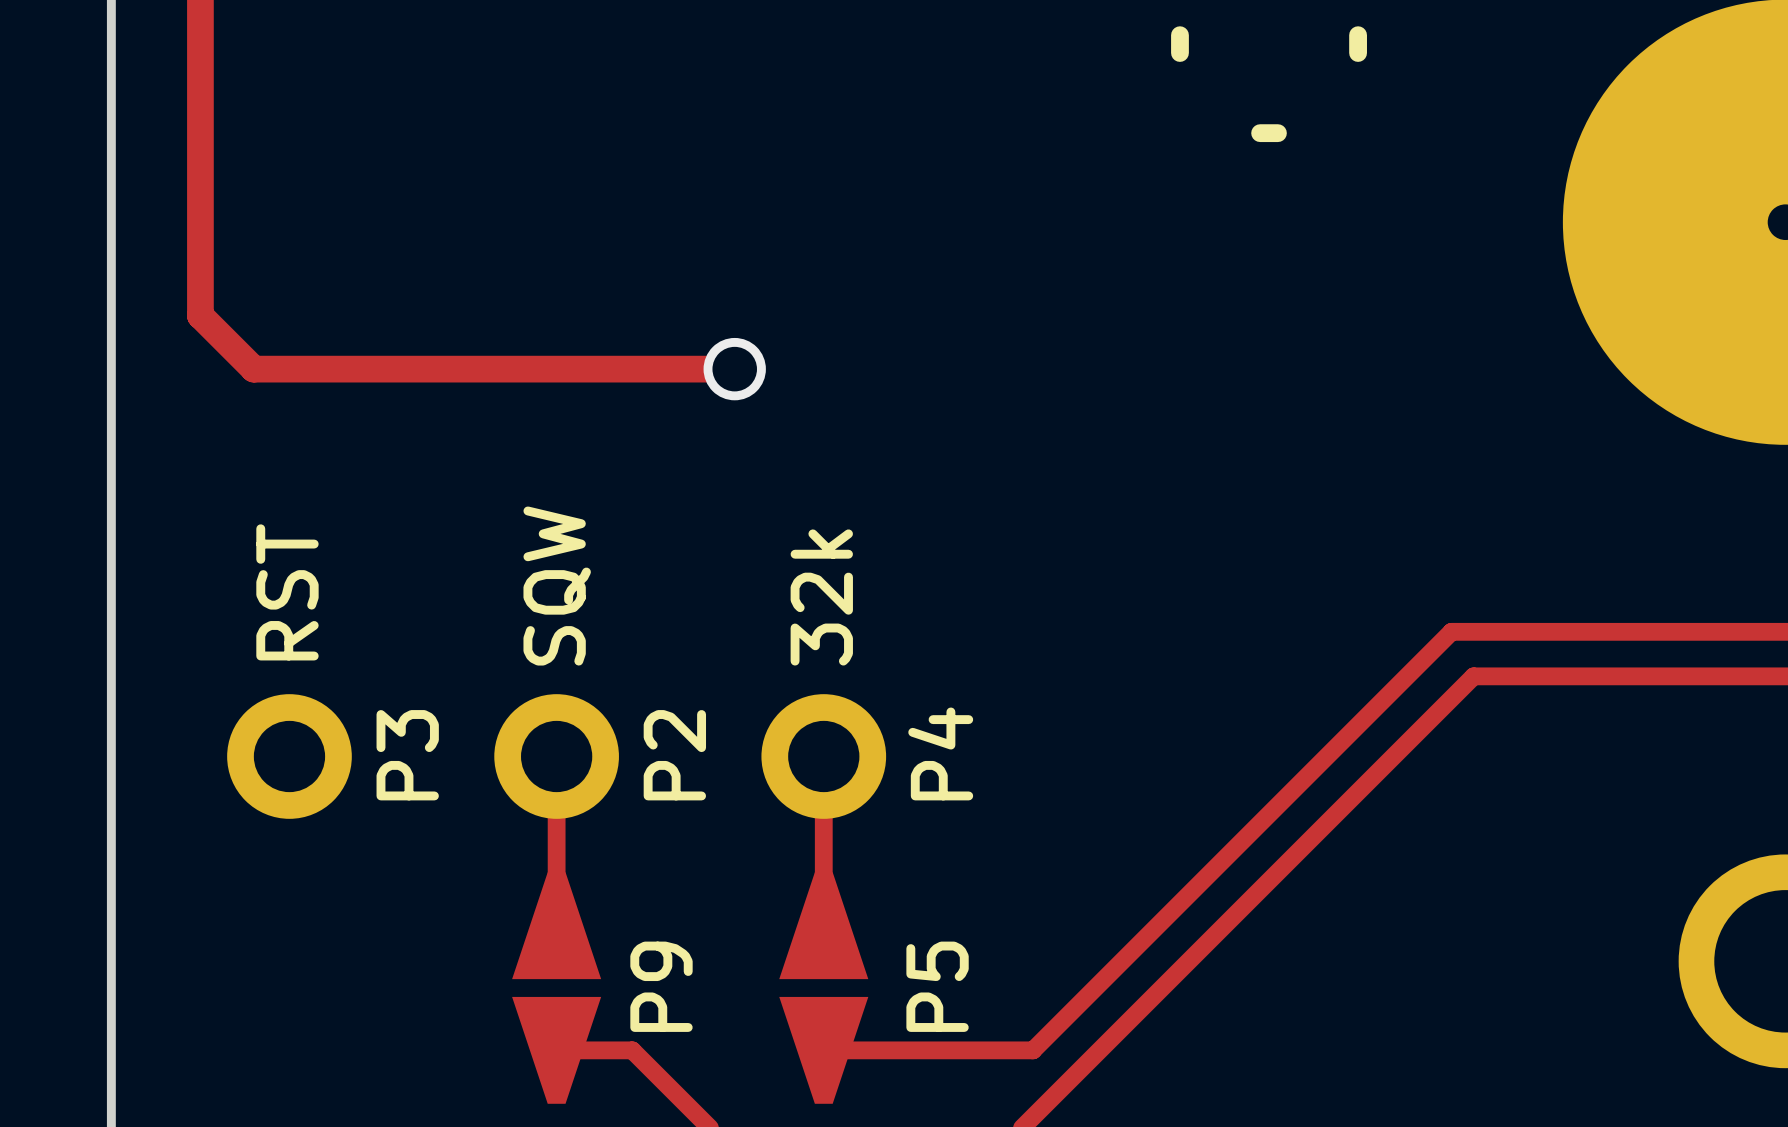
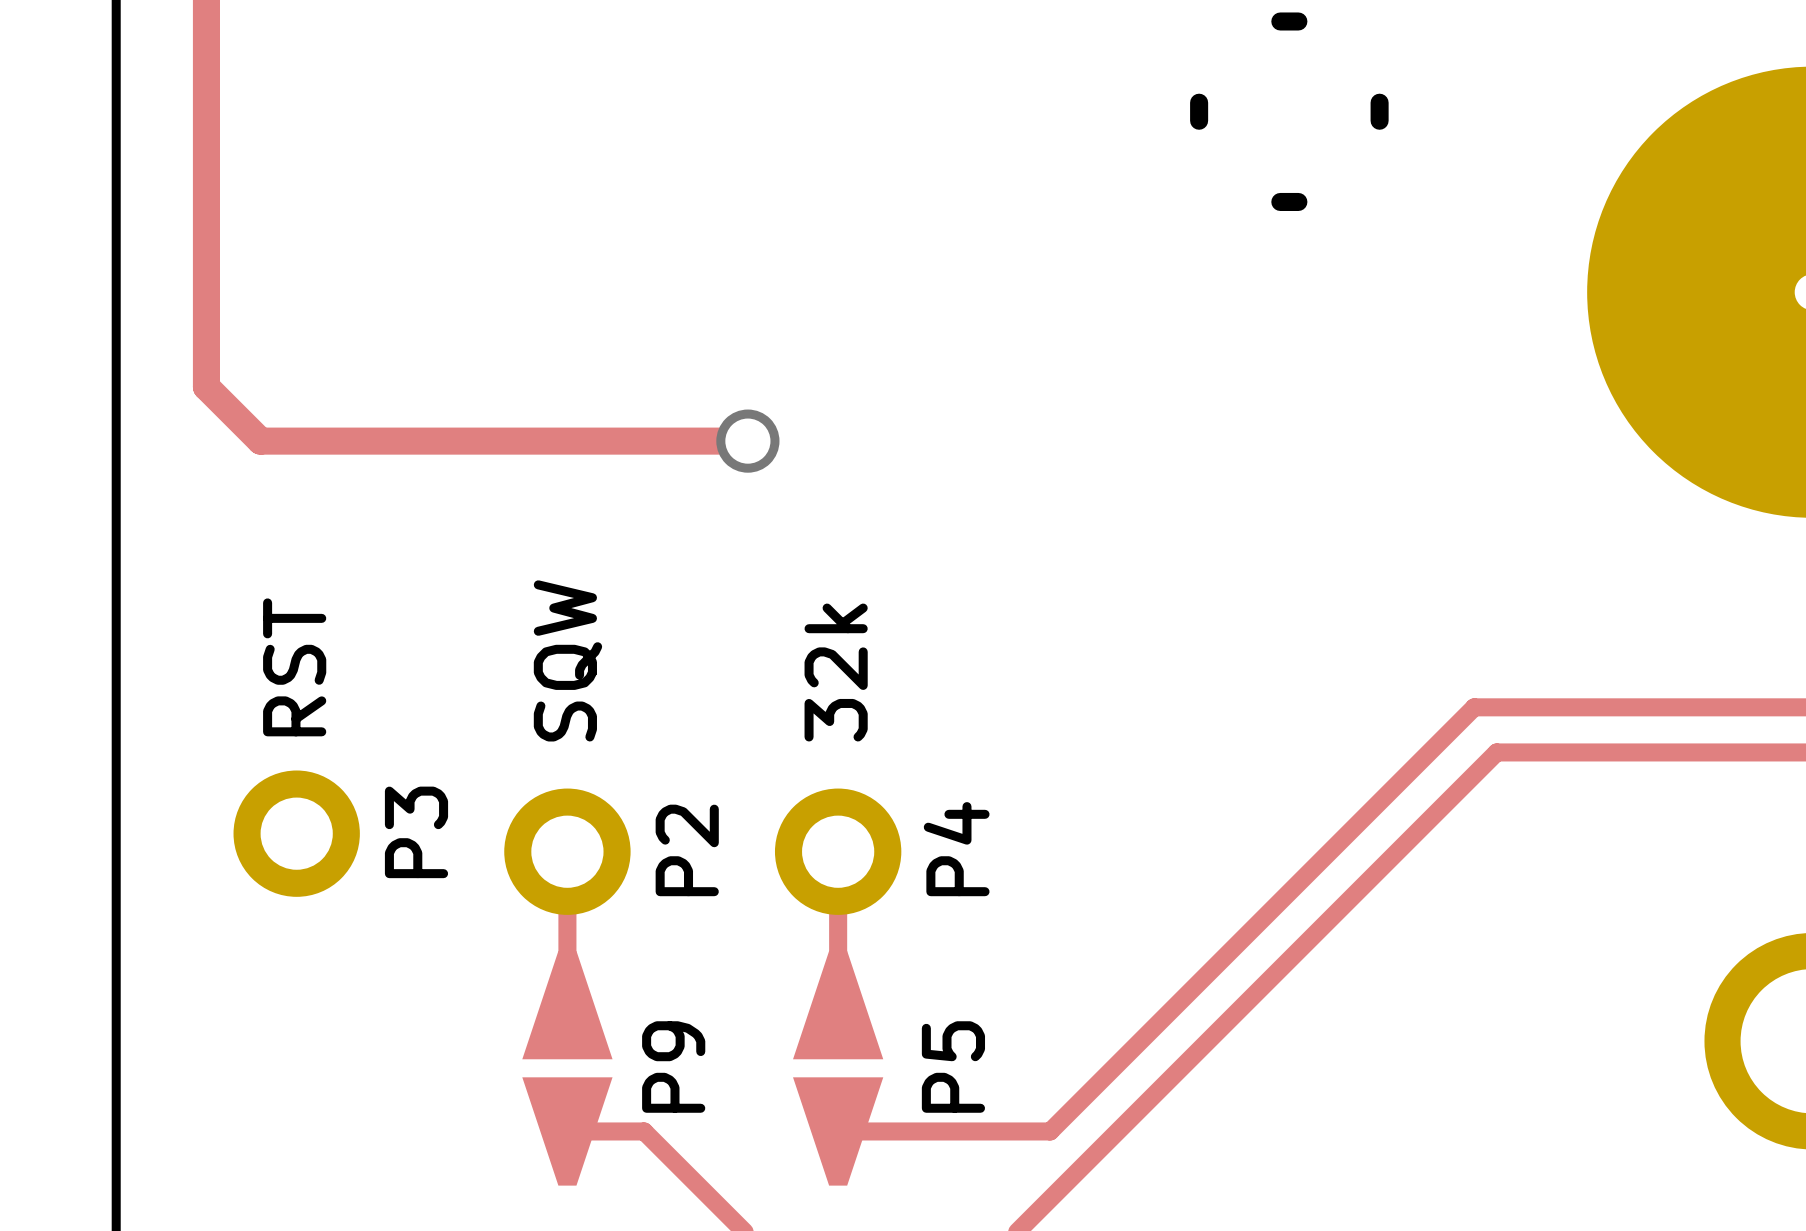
P2 position: (556, 756) -> (567, 851)
P4 position: (823, 756) -> (838, 851)

